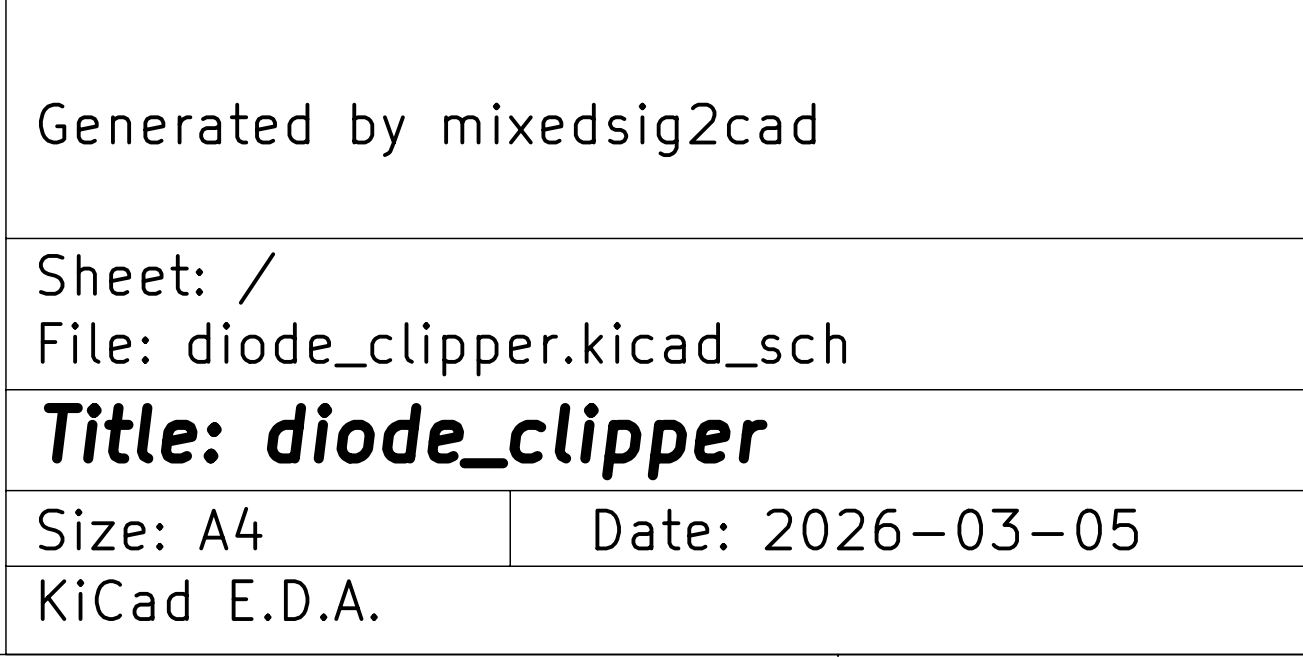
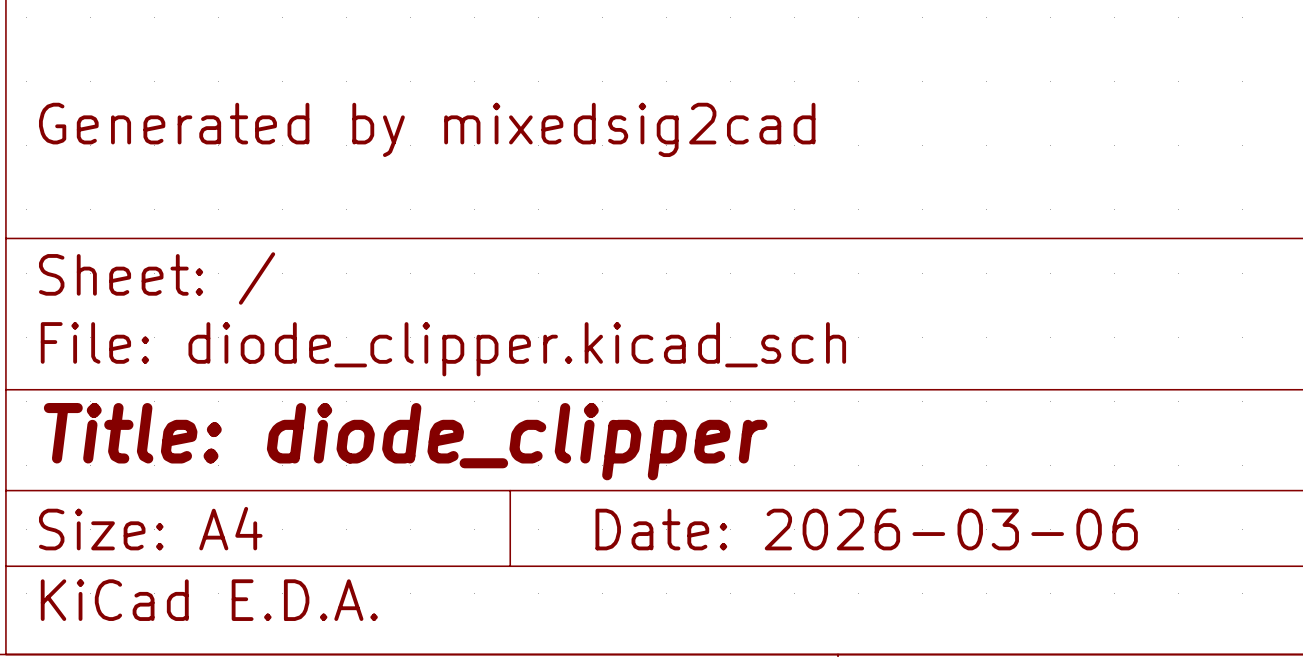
title block: Date: 2026-03-05 (866, 529) -> Date: 2026-03-06 (866, 529)

